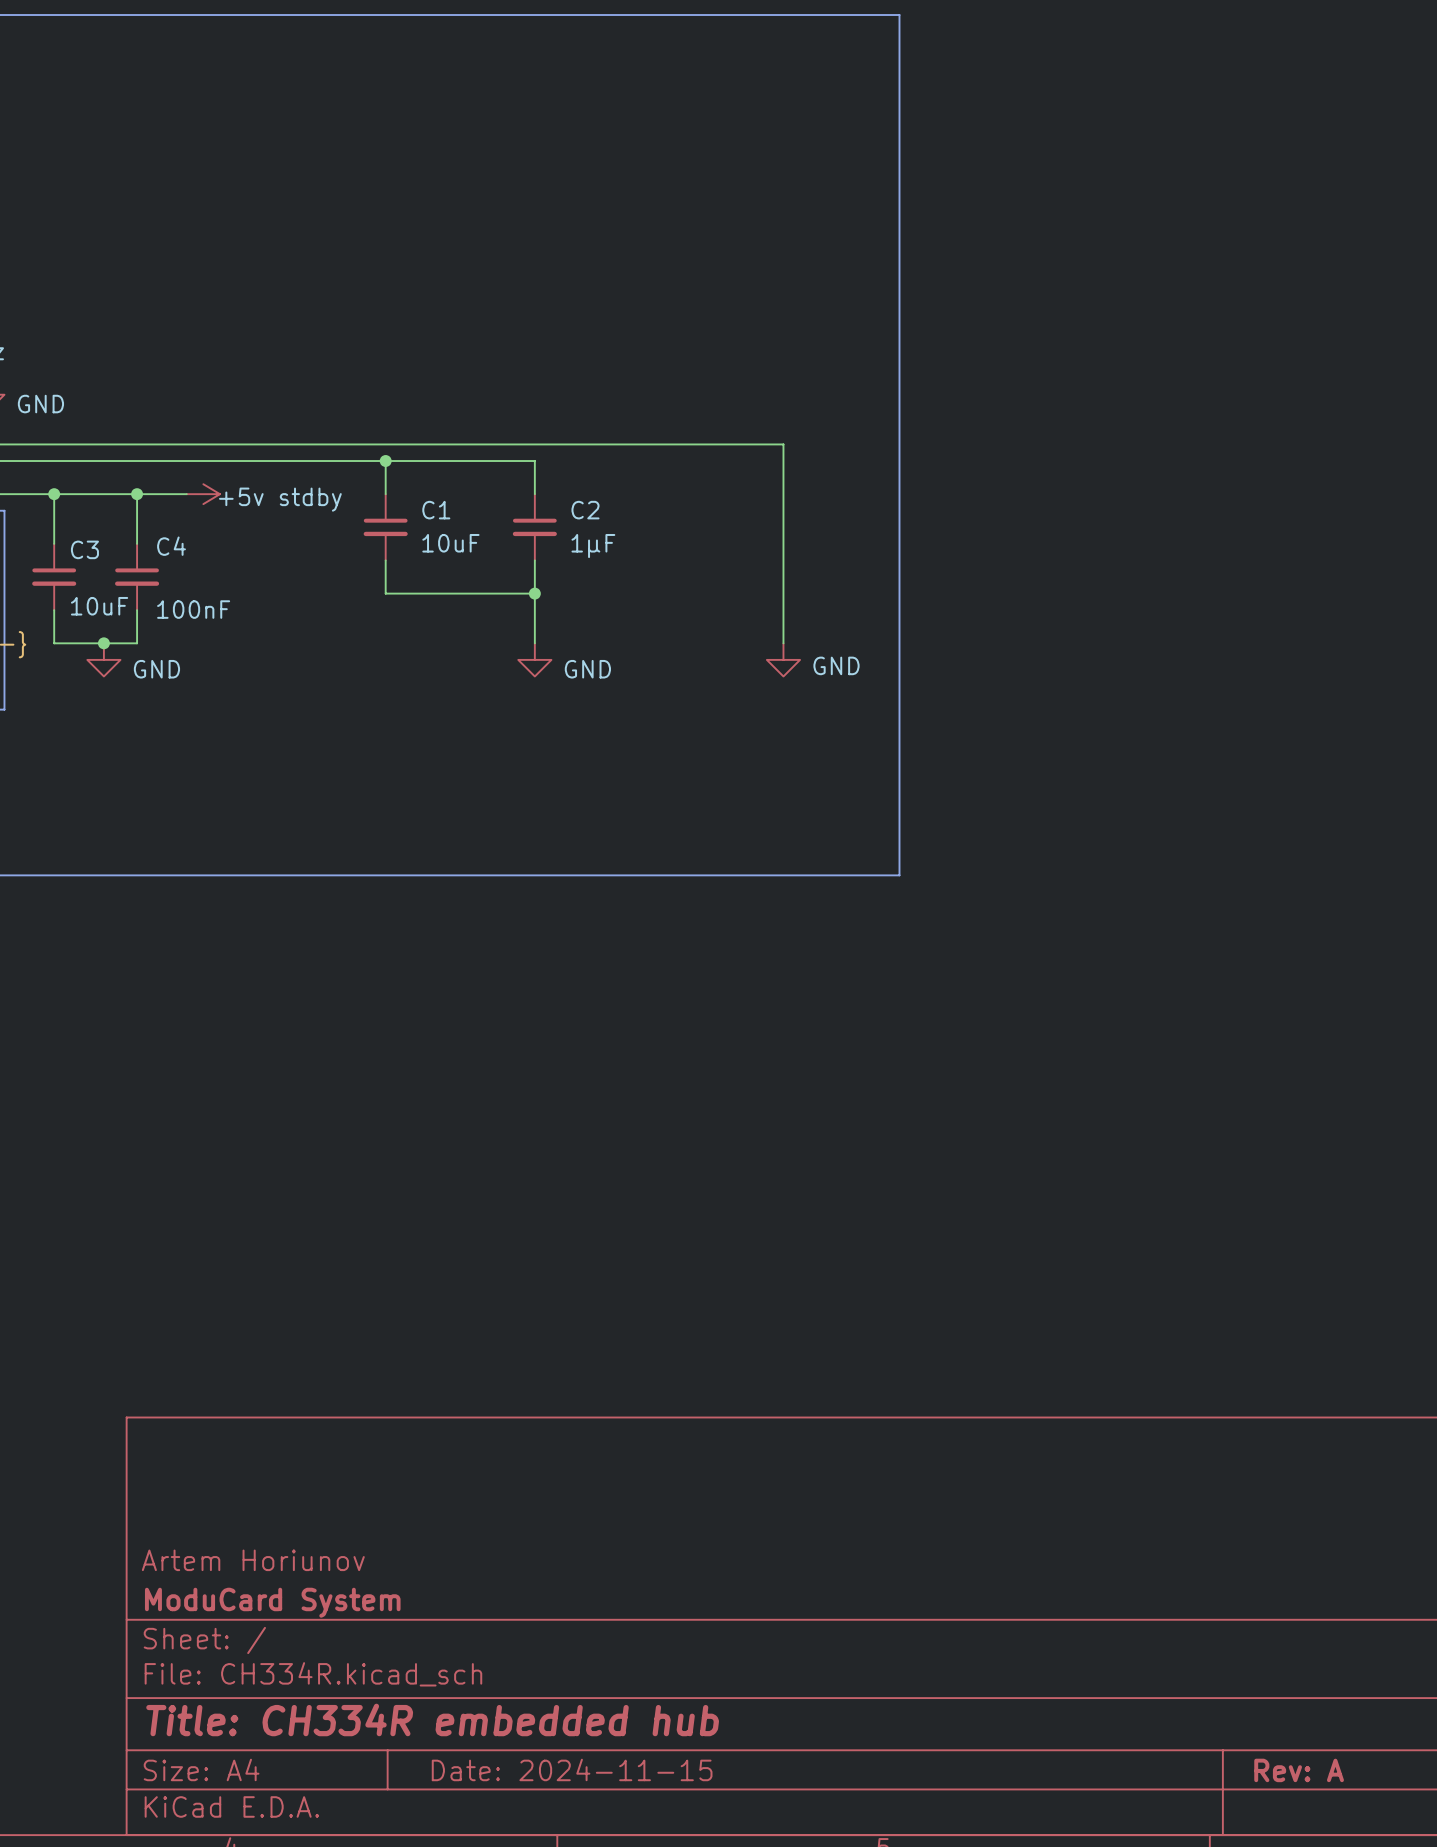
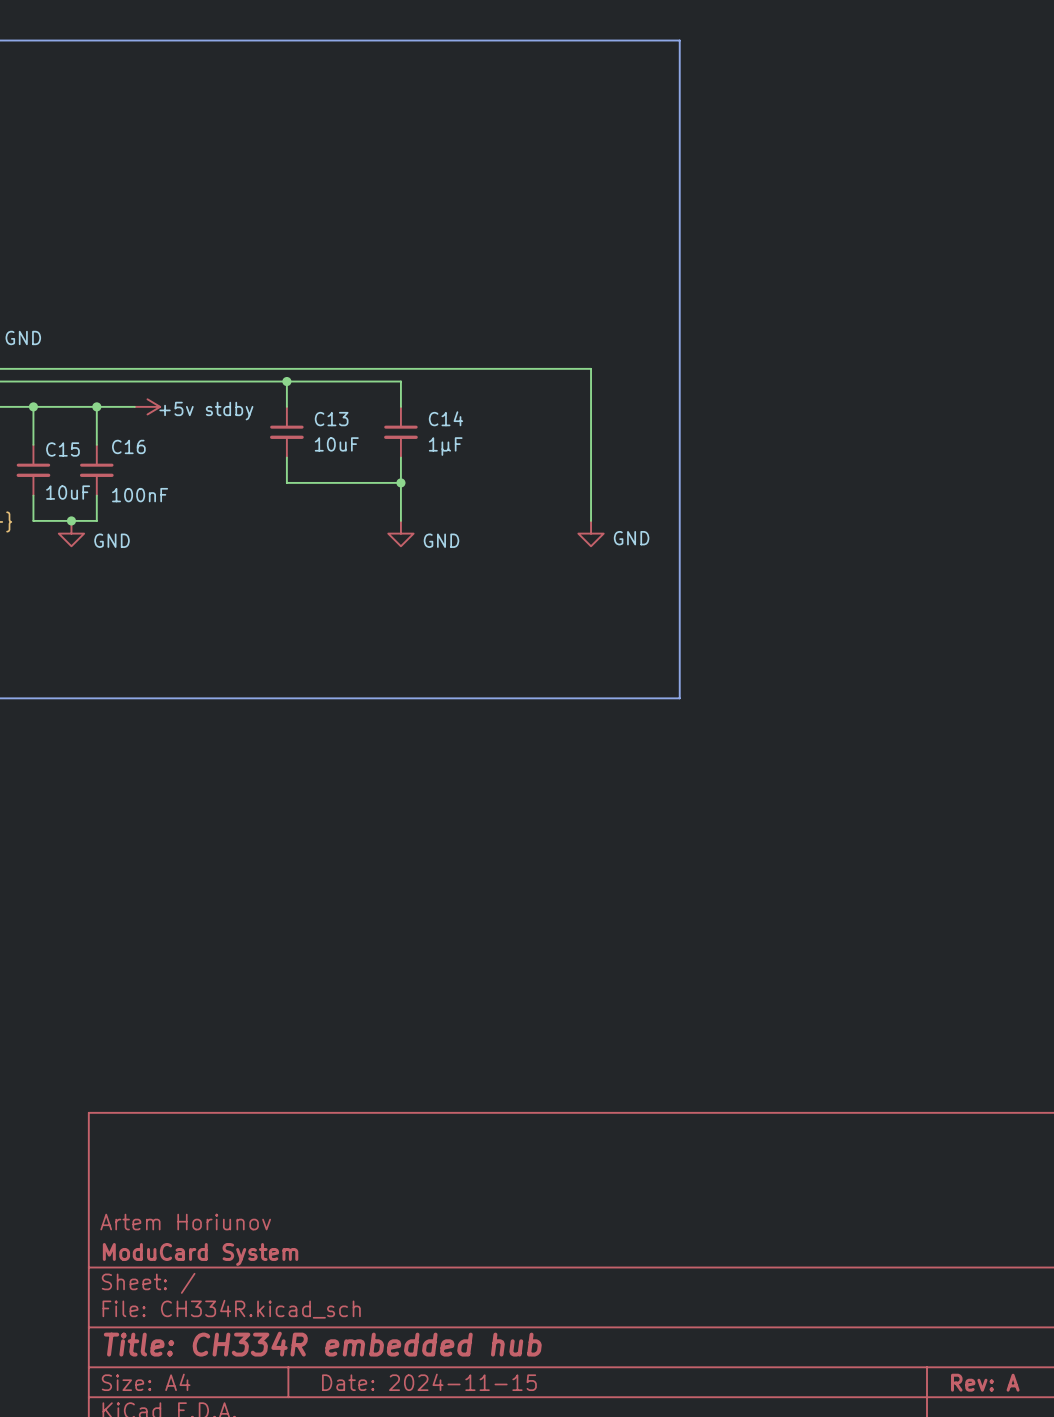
C1 name: C1 (436, 510) -> C13 (331, 419)
C2 name: C2 (585, 510) -> C14 (445, 418)
C4 name: C4 (171, 546) -> C16 (128, 446)
C3 name: C3 (84, 549) -> C15 (62, 449)

